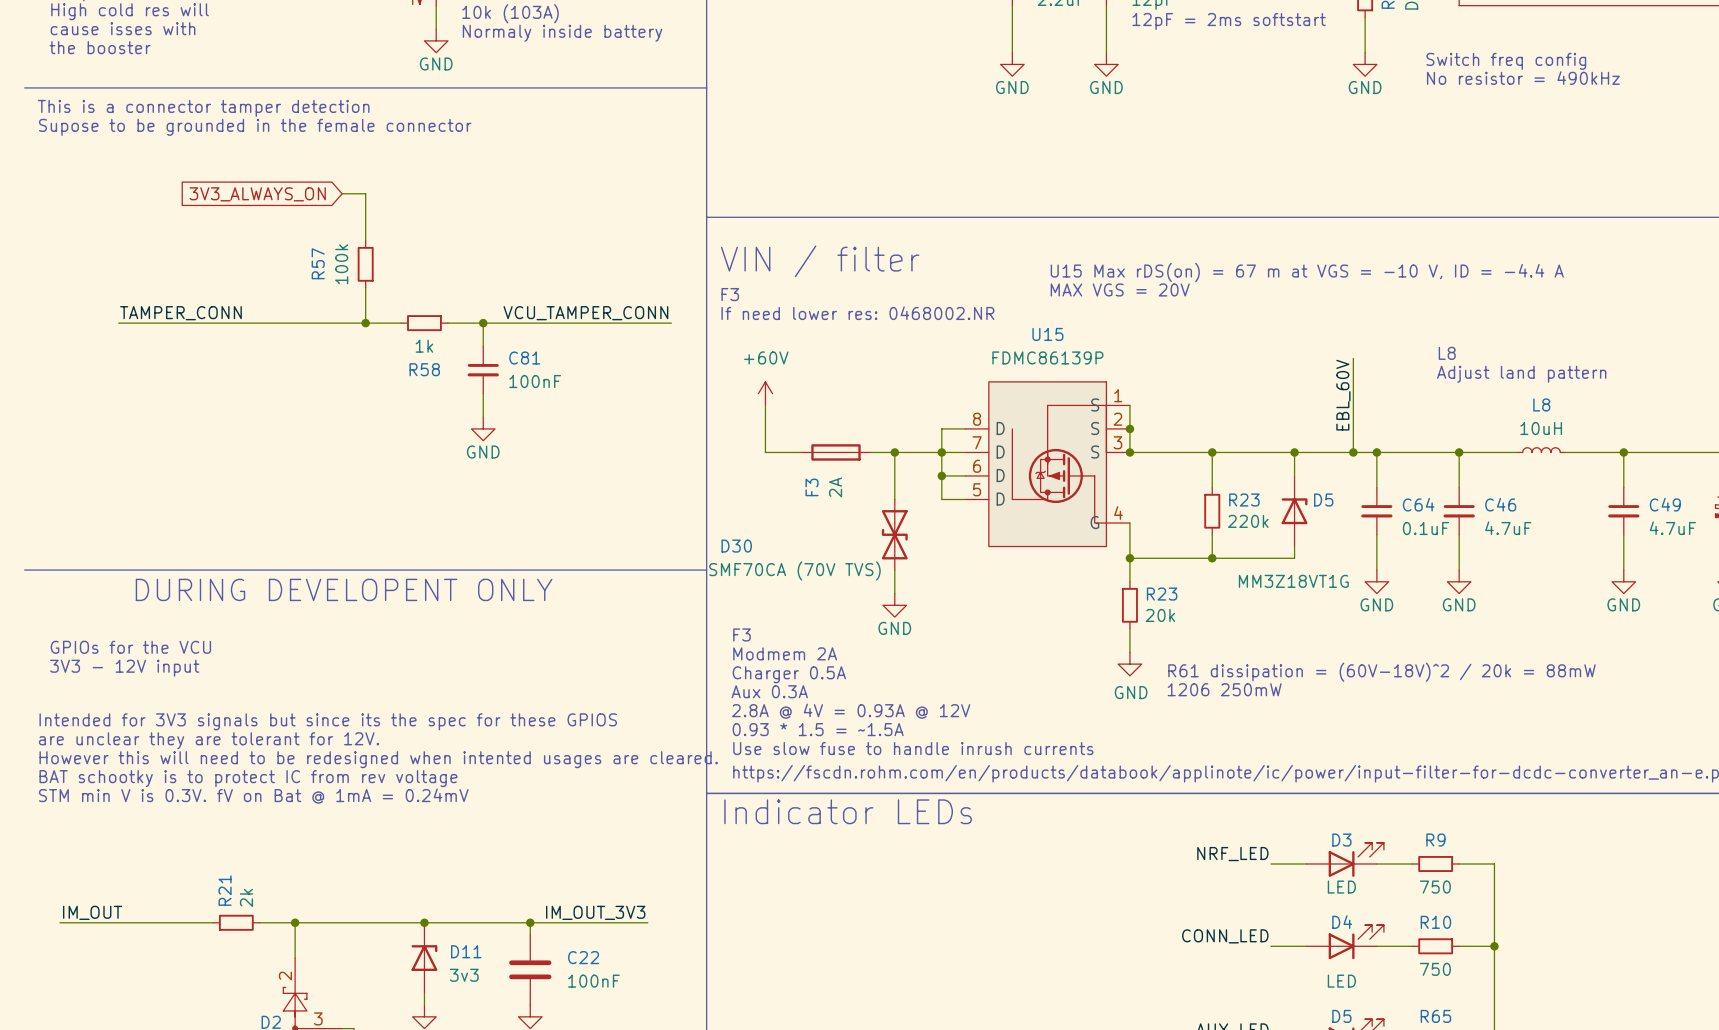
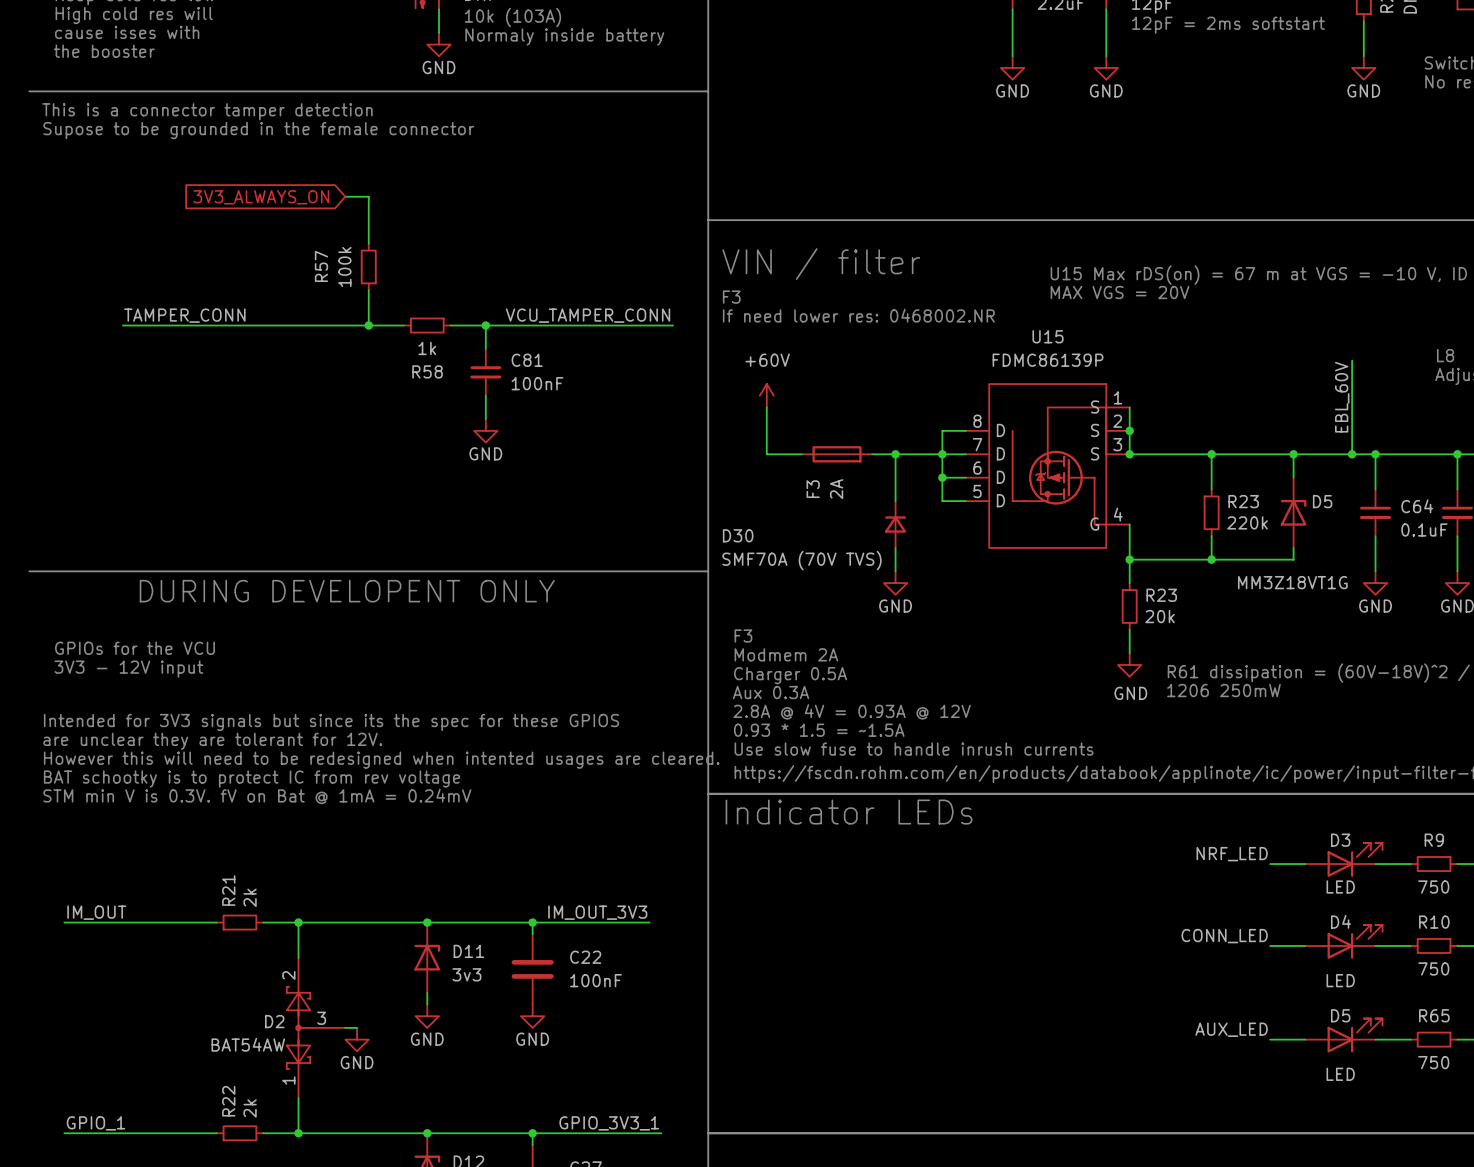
D30 symbol: [881, 499, 908, 571] -> [885, 501, 907, 548]
D30 value: SMF70CA (70V TVS) (794, 571) -> SMF70A (70V TVS) (801, 560)
power symbol position: GND (894, 605) -> GND (895, 583)

